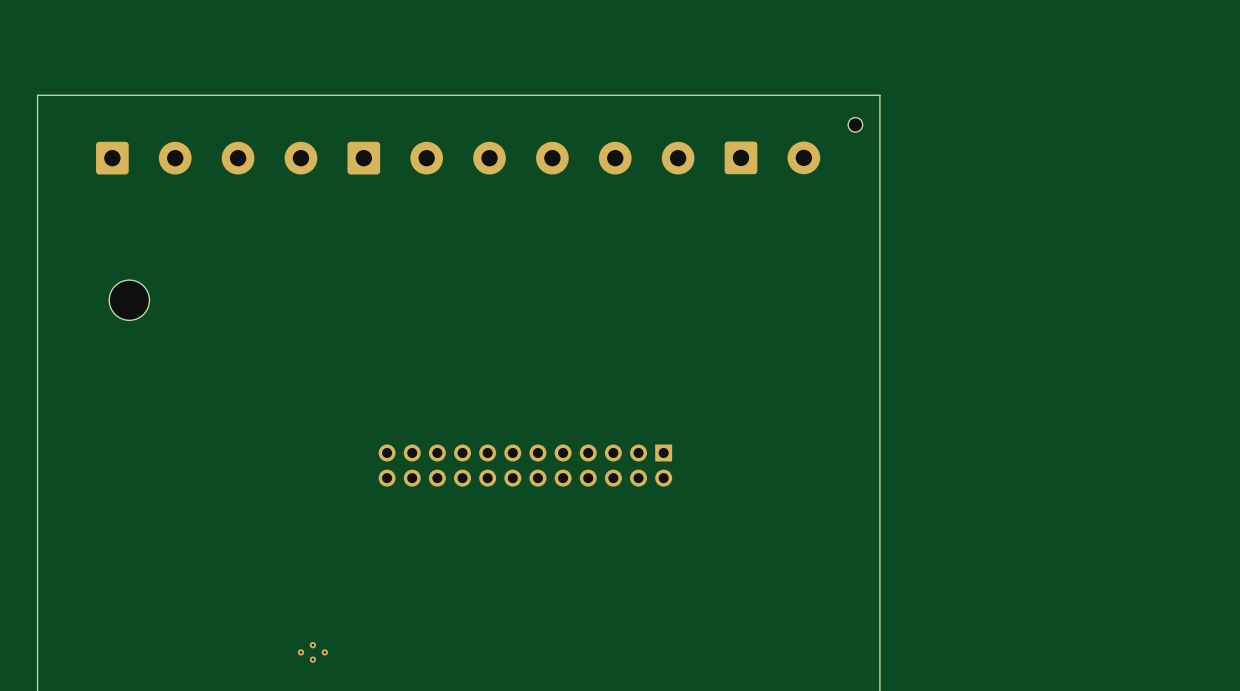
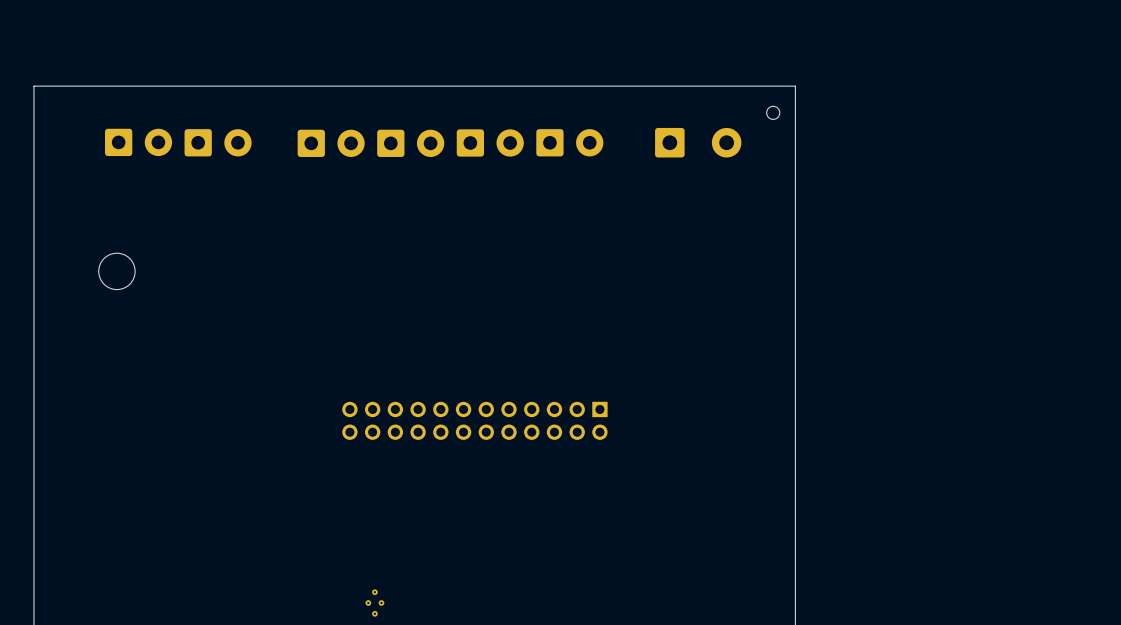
part: none -> (138, 142)
part: none -> (218, 142)
part: none -> (569, 142)
part: (206, 158) -> none
part: none -> (331, 143)
part: none -> (410, 143)
part: (520, 158) -> none
part: none -> (490, 142)
part rotation: 0° (312, 652) -> 90° clockwise (374, 603)
part position: (312, 652) -> (374, 603)

